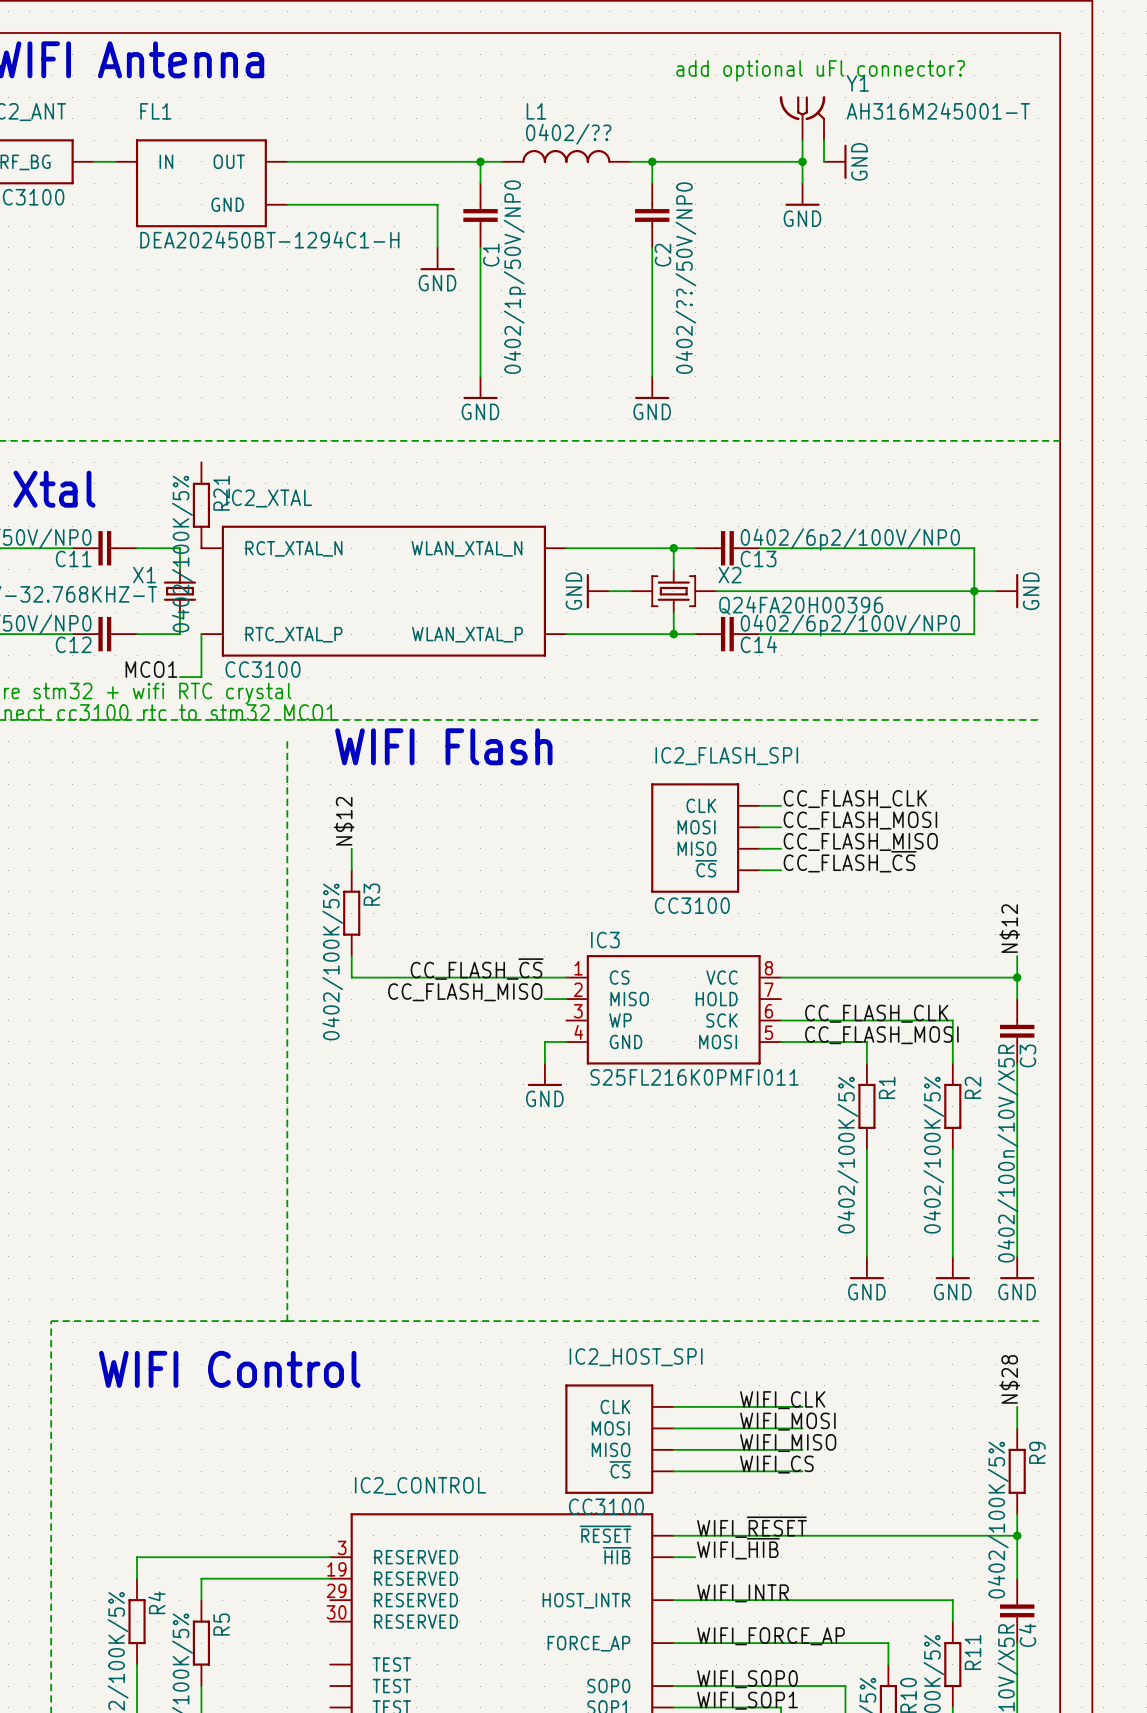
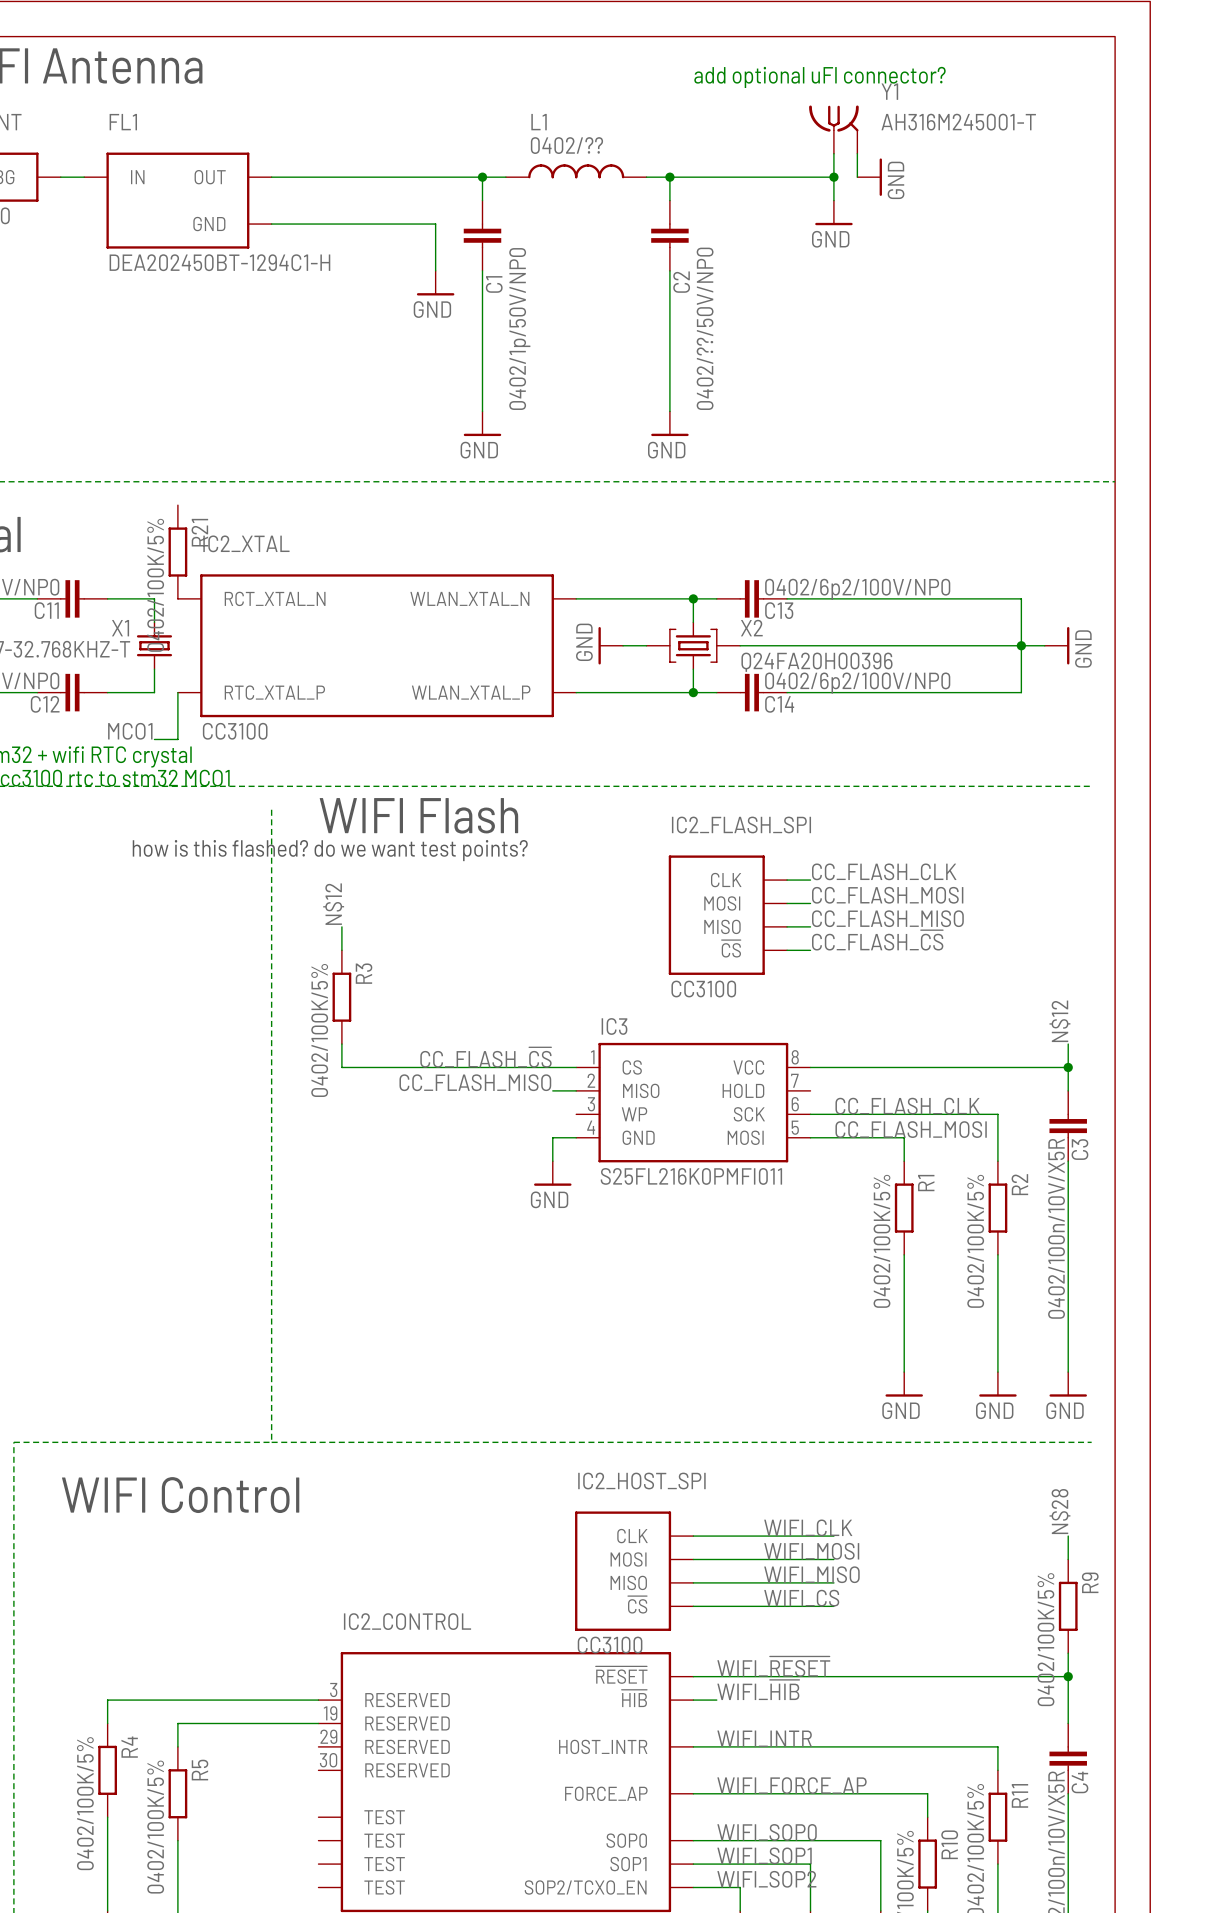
text: none -> how is this flashed? do we want test points? (330, 850)

